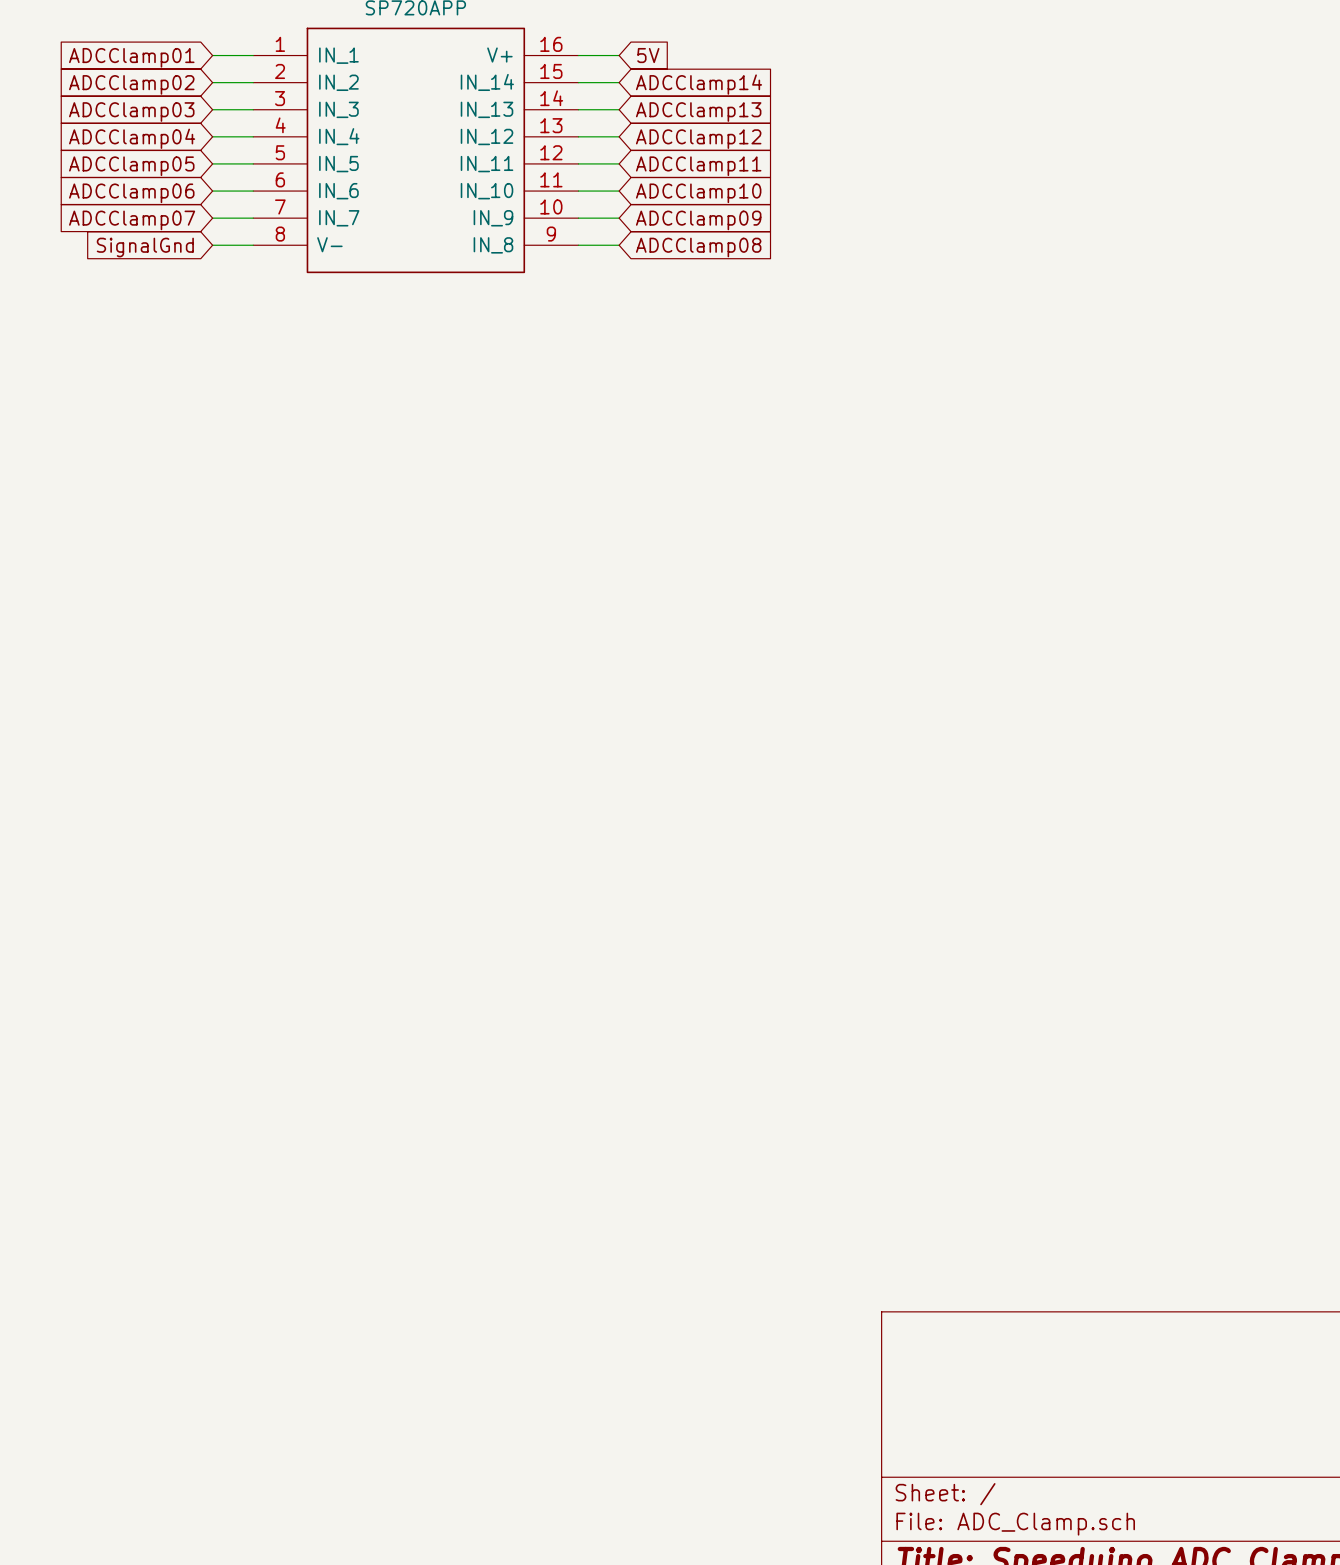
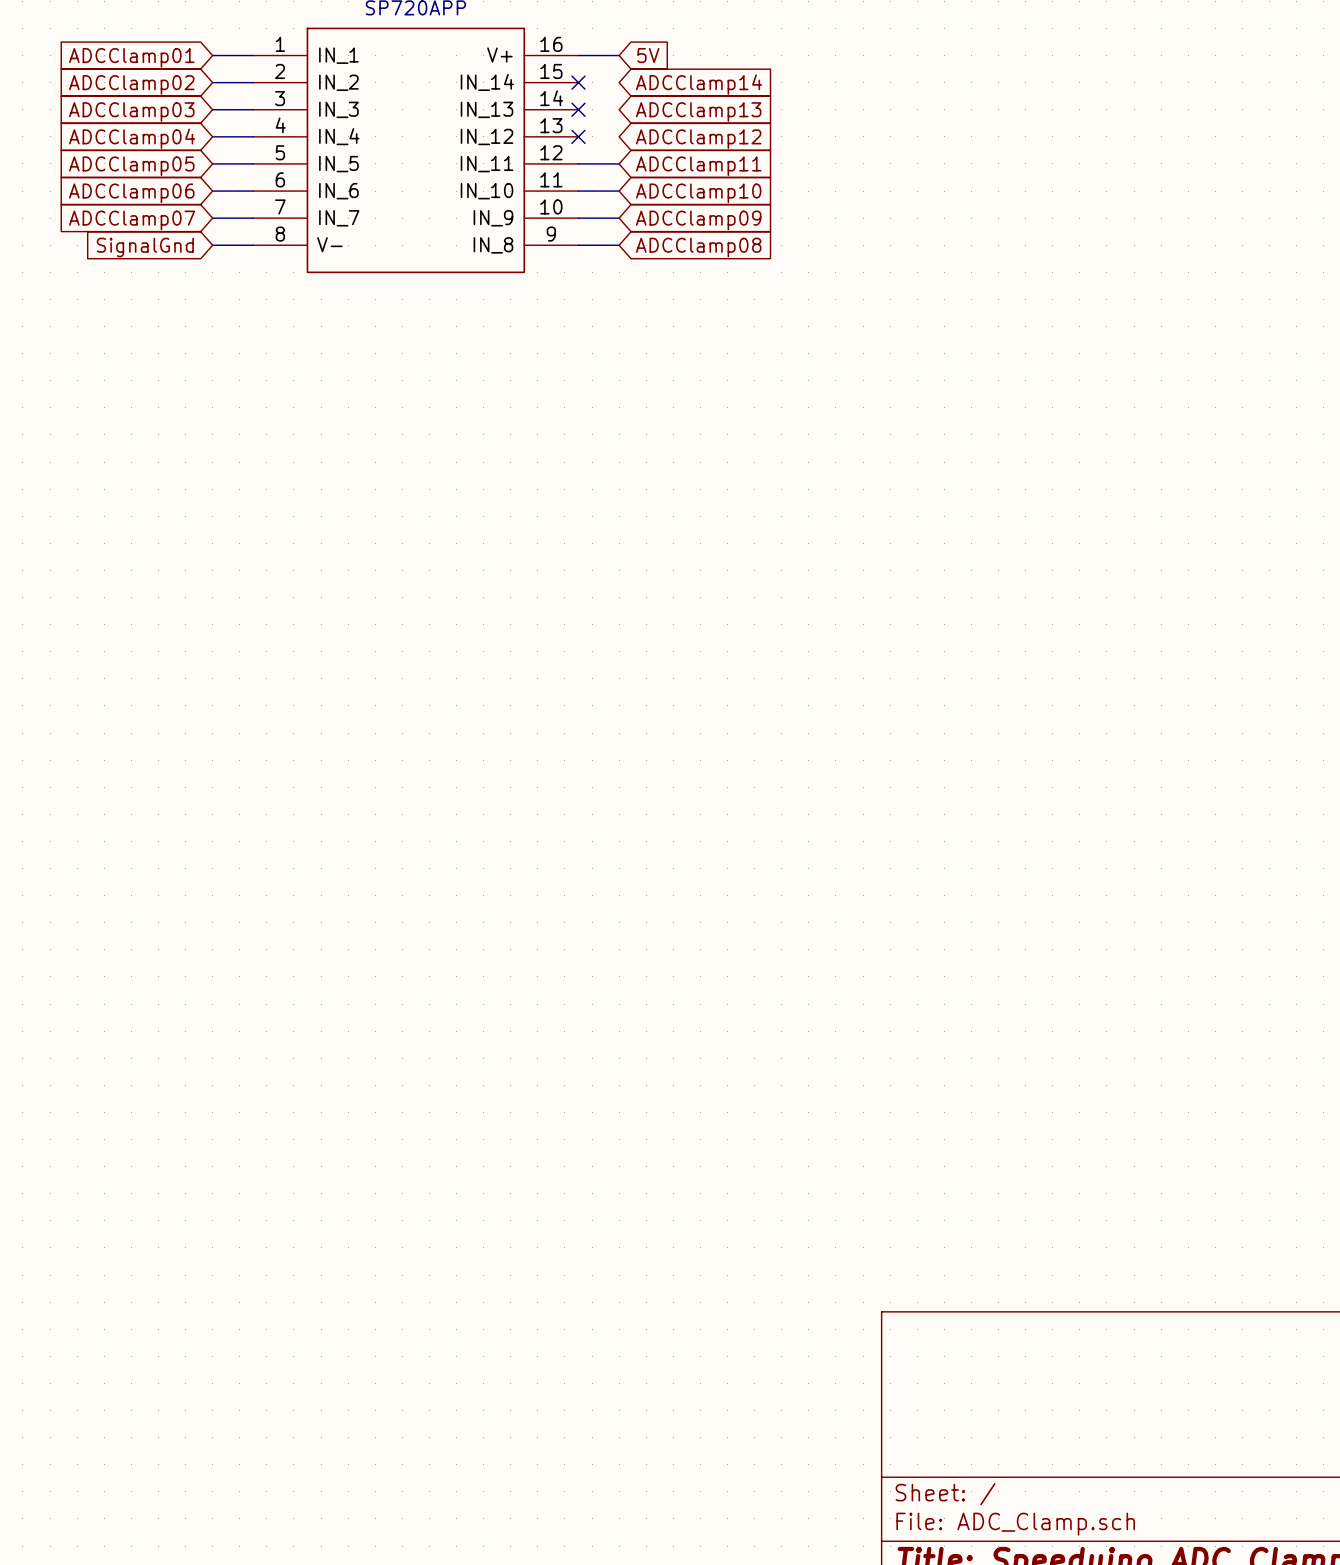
wire: (578, 82) (619, 82) -> none
no-connect mark: none -> (578, 82)
wire: (578, 109) (619, 109) -> none
no-connect mark: none -> (578, 109)
wire: (578, 136) (619, 136) -> none
no-connect mark: none -> (578, 136)

